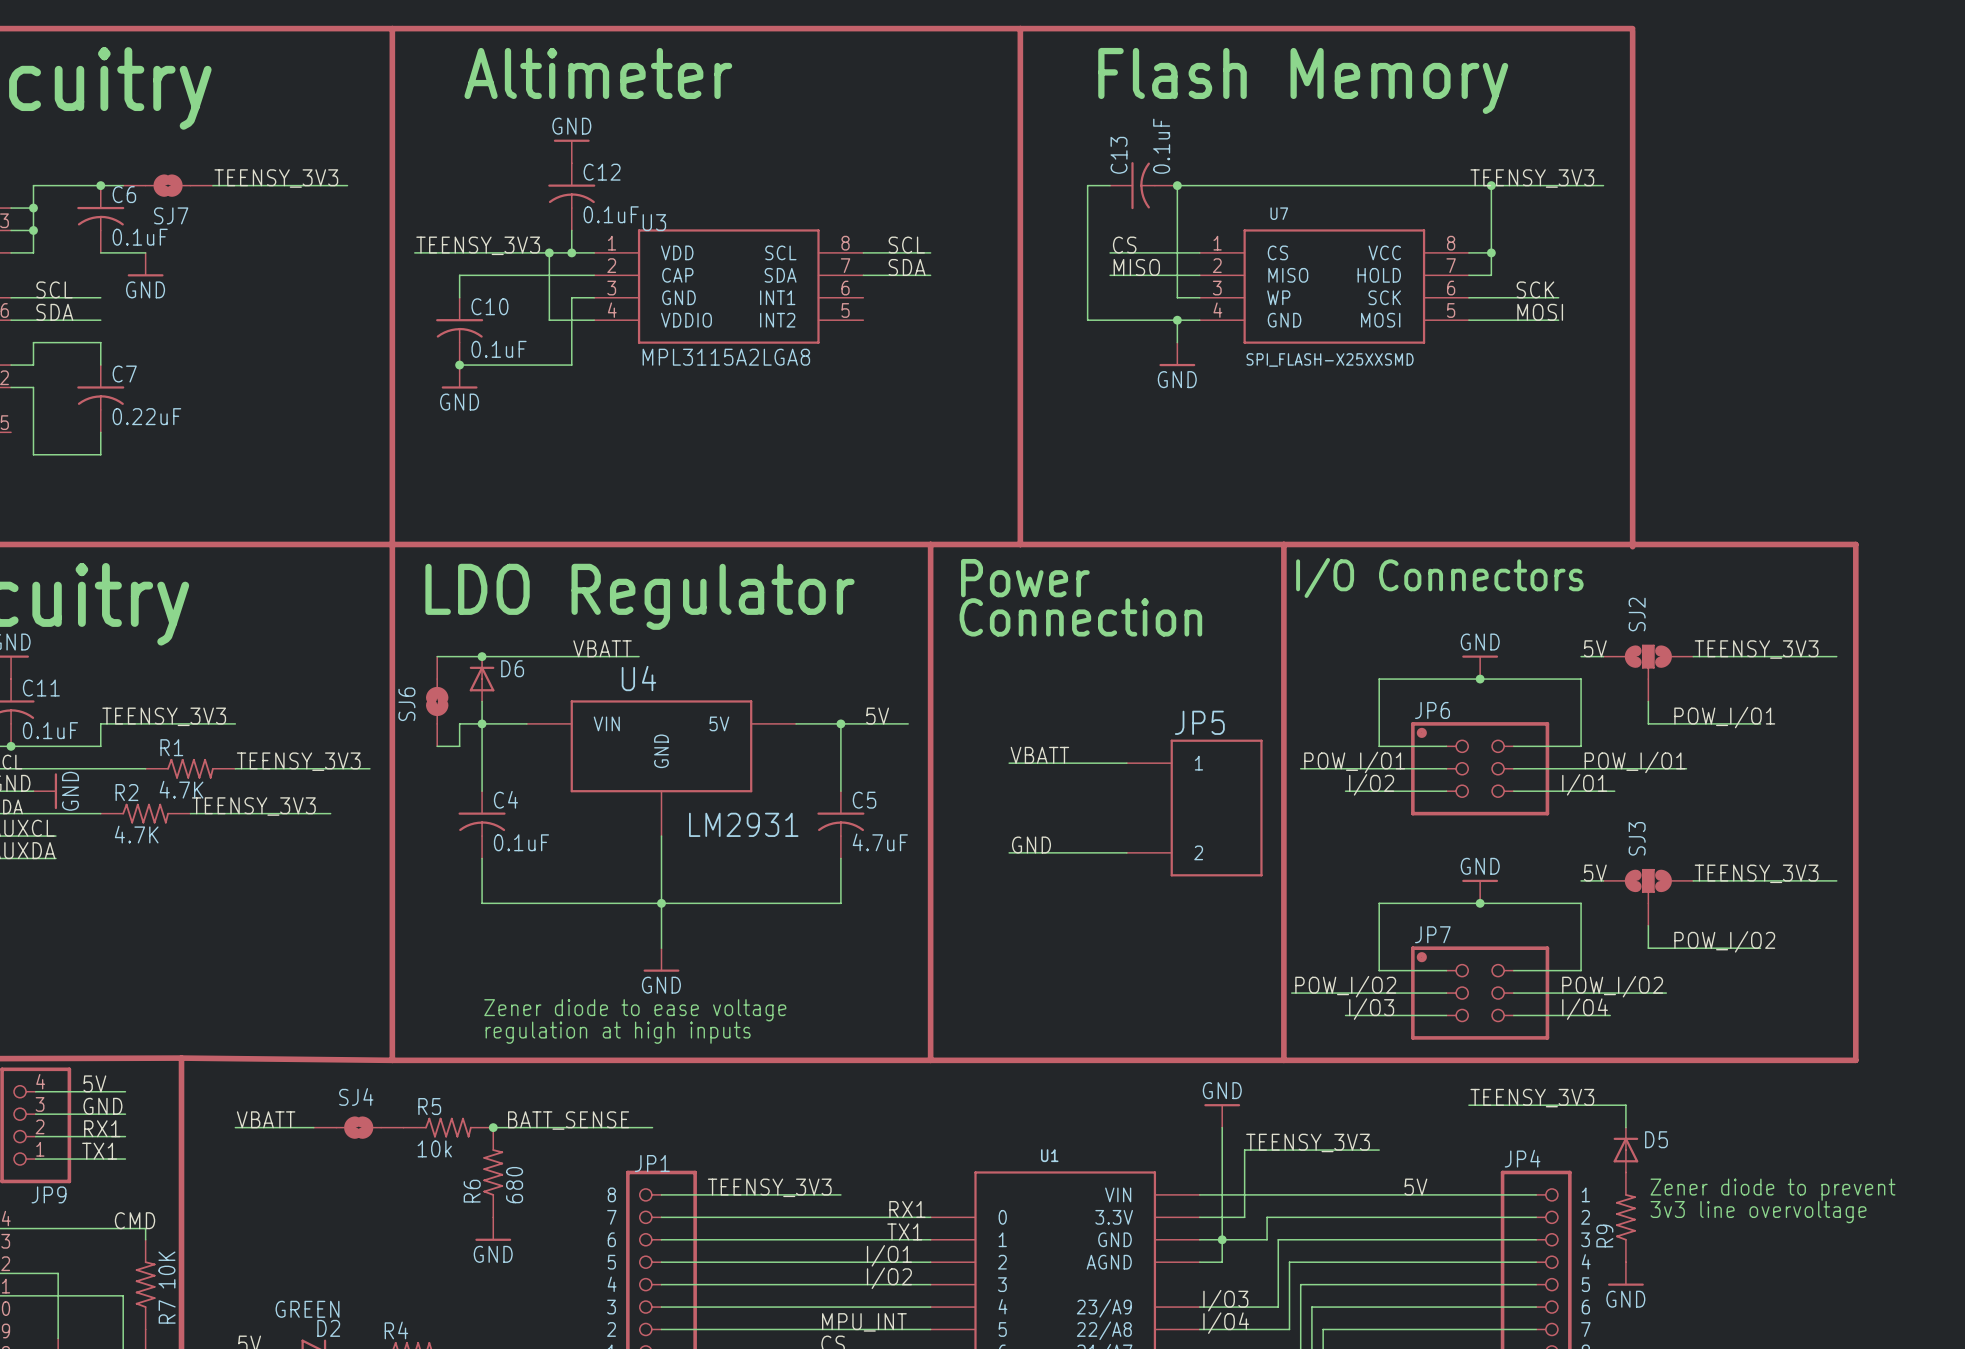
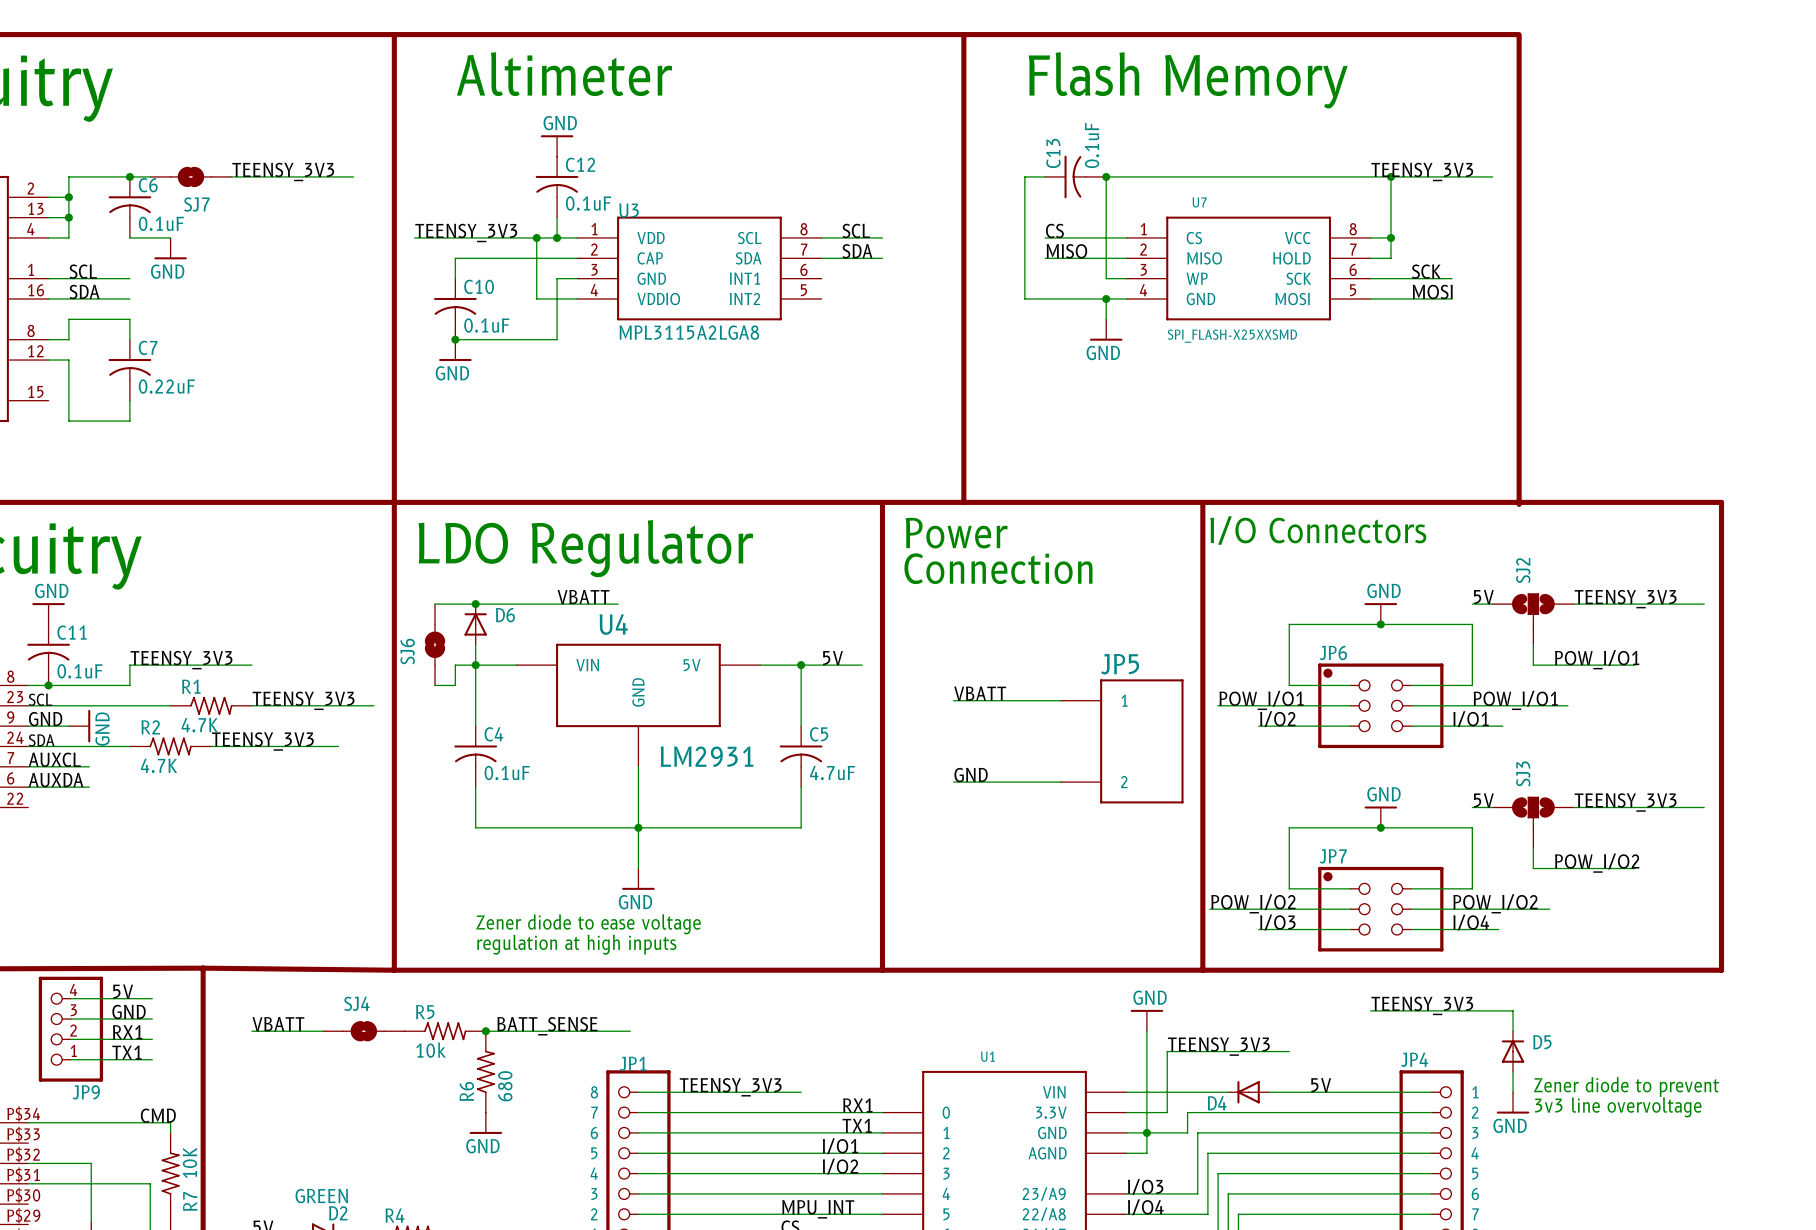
D4: none -> (1248, 1092)
R9: (1625, 1217) -> none
power symbol position: GND (1625, 1273) -> GND (1513, 1102)

